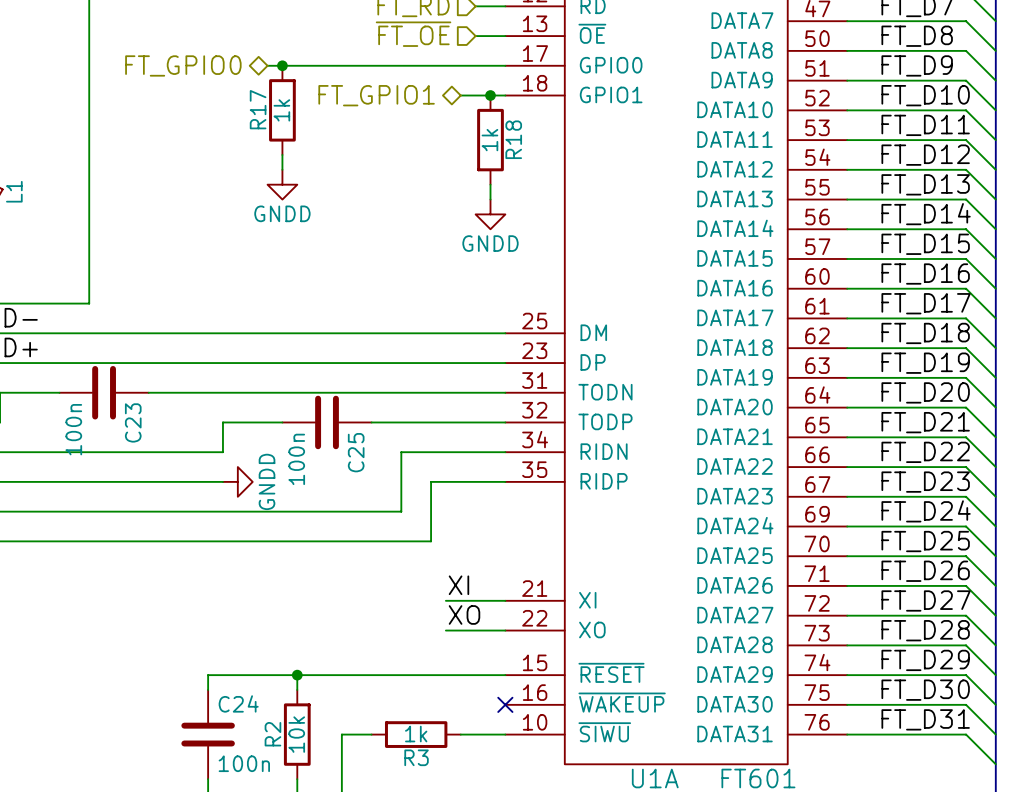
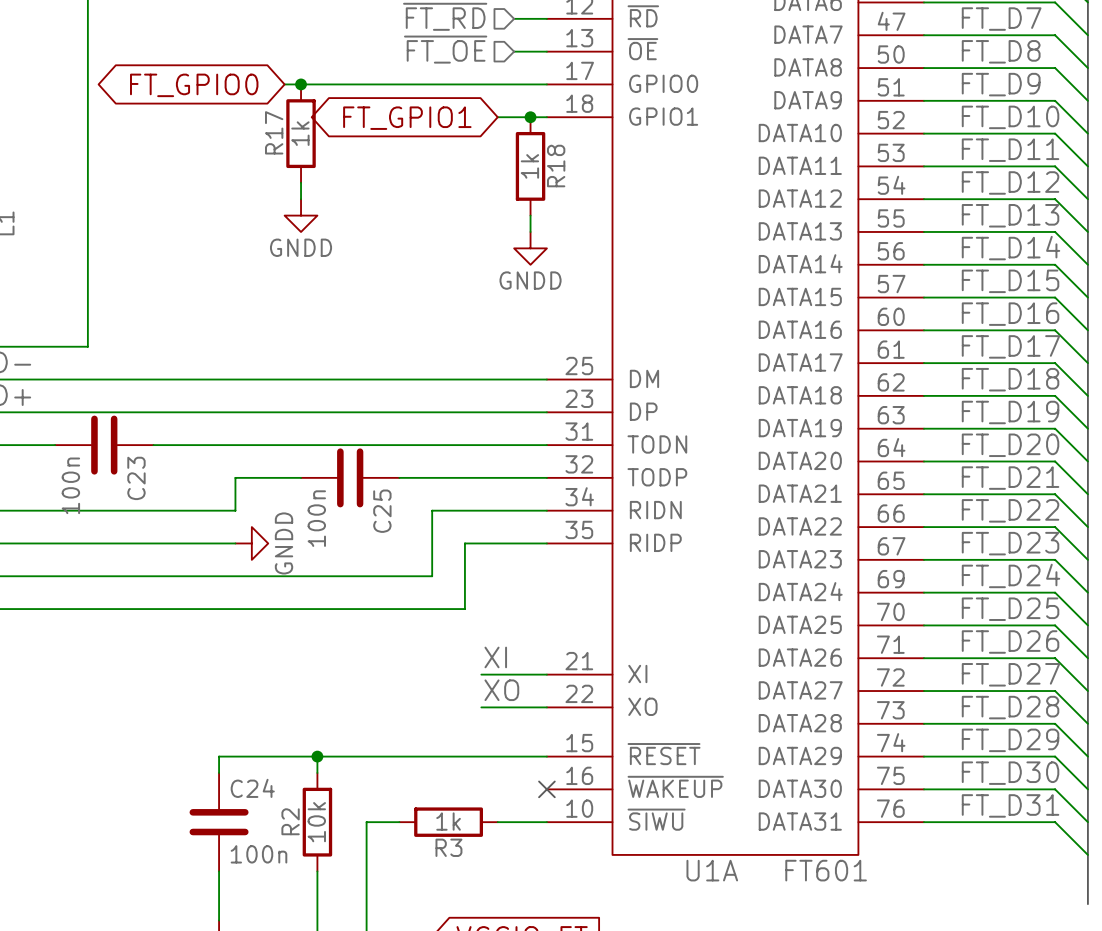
hierarchical label: FT_GPIO0 (183, 65) -> none
global label: none -> FT_GPIO0 (194, 85)
hierarchical label: FT_GPIO1 (376, 95) -> none
global label: none -> FT_GPIO1 (407, 118)

